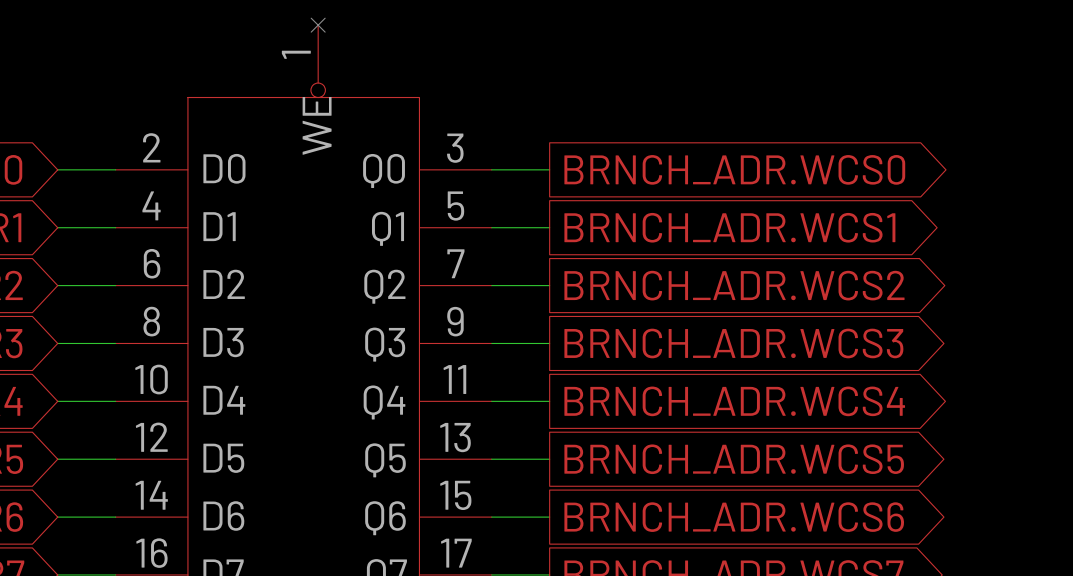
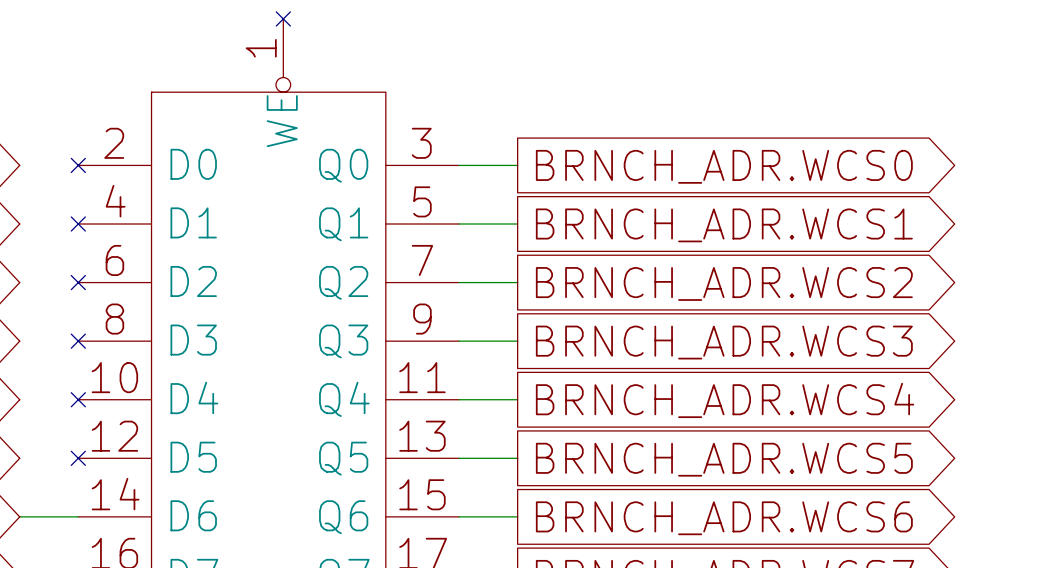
wire: (57, 169) (115, 169) -> none
no-connect mark: none -> (78, 165)
wire: (57, 227) (115, 227) -> none
no-connect mark: none -> (78, 224)
wire: (57, 285) (115, 285) -> none
no-connect mark: none -> (78, 282)
wire: (57, 343) (115, 343) -> none
no-connect mark: none -> (78, 341)
wire: (57, 401) (115, 401) -> none
no-connect mark: none -> (78, 399)
wire: (57, 459) (115, 459) -> none
no-connect mark: none -> (78, 458)

